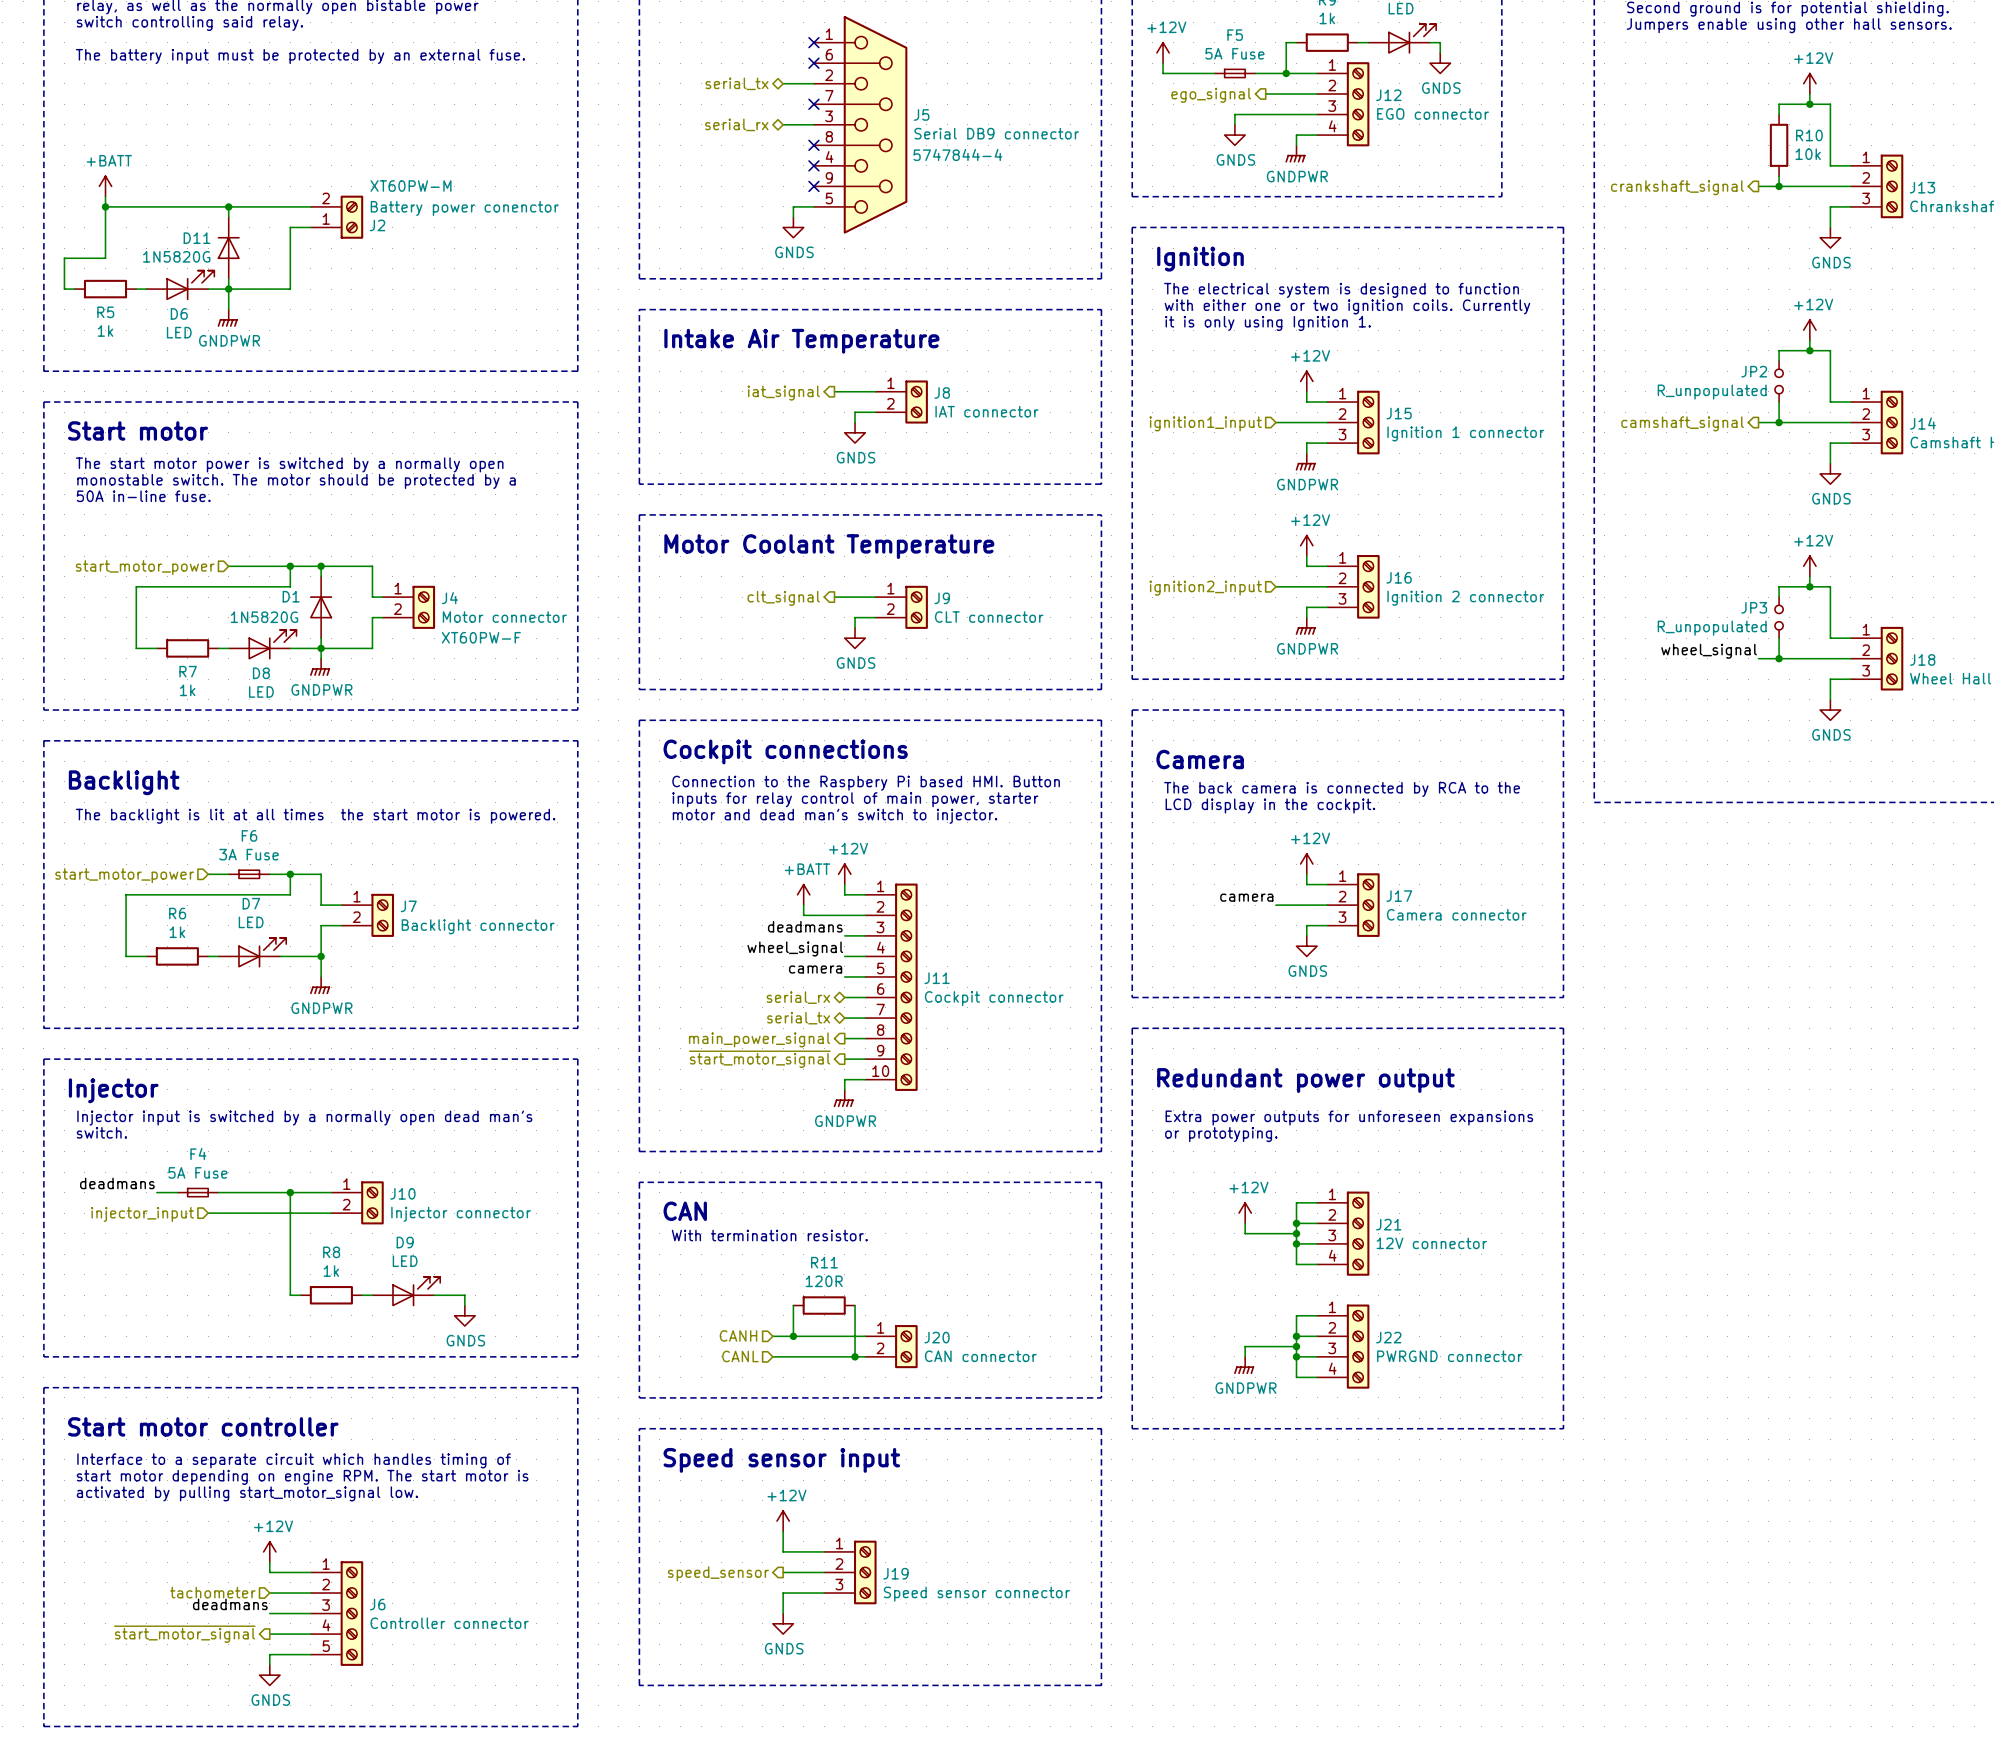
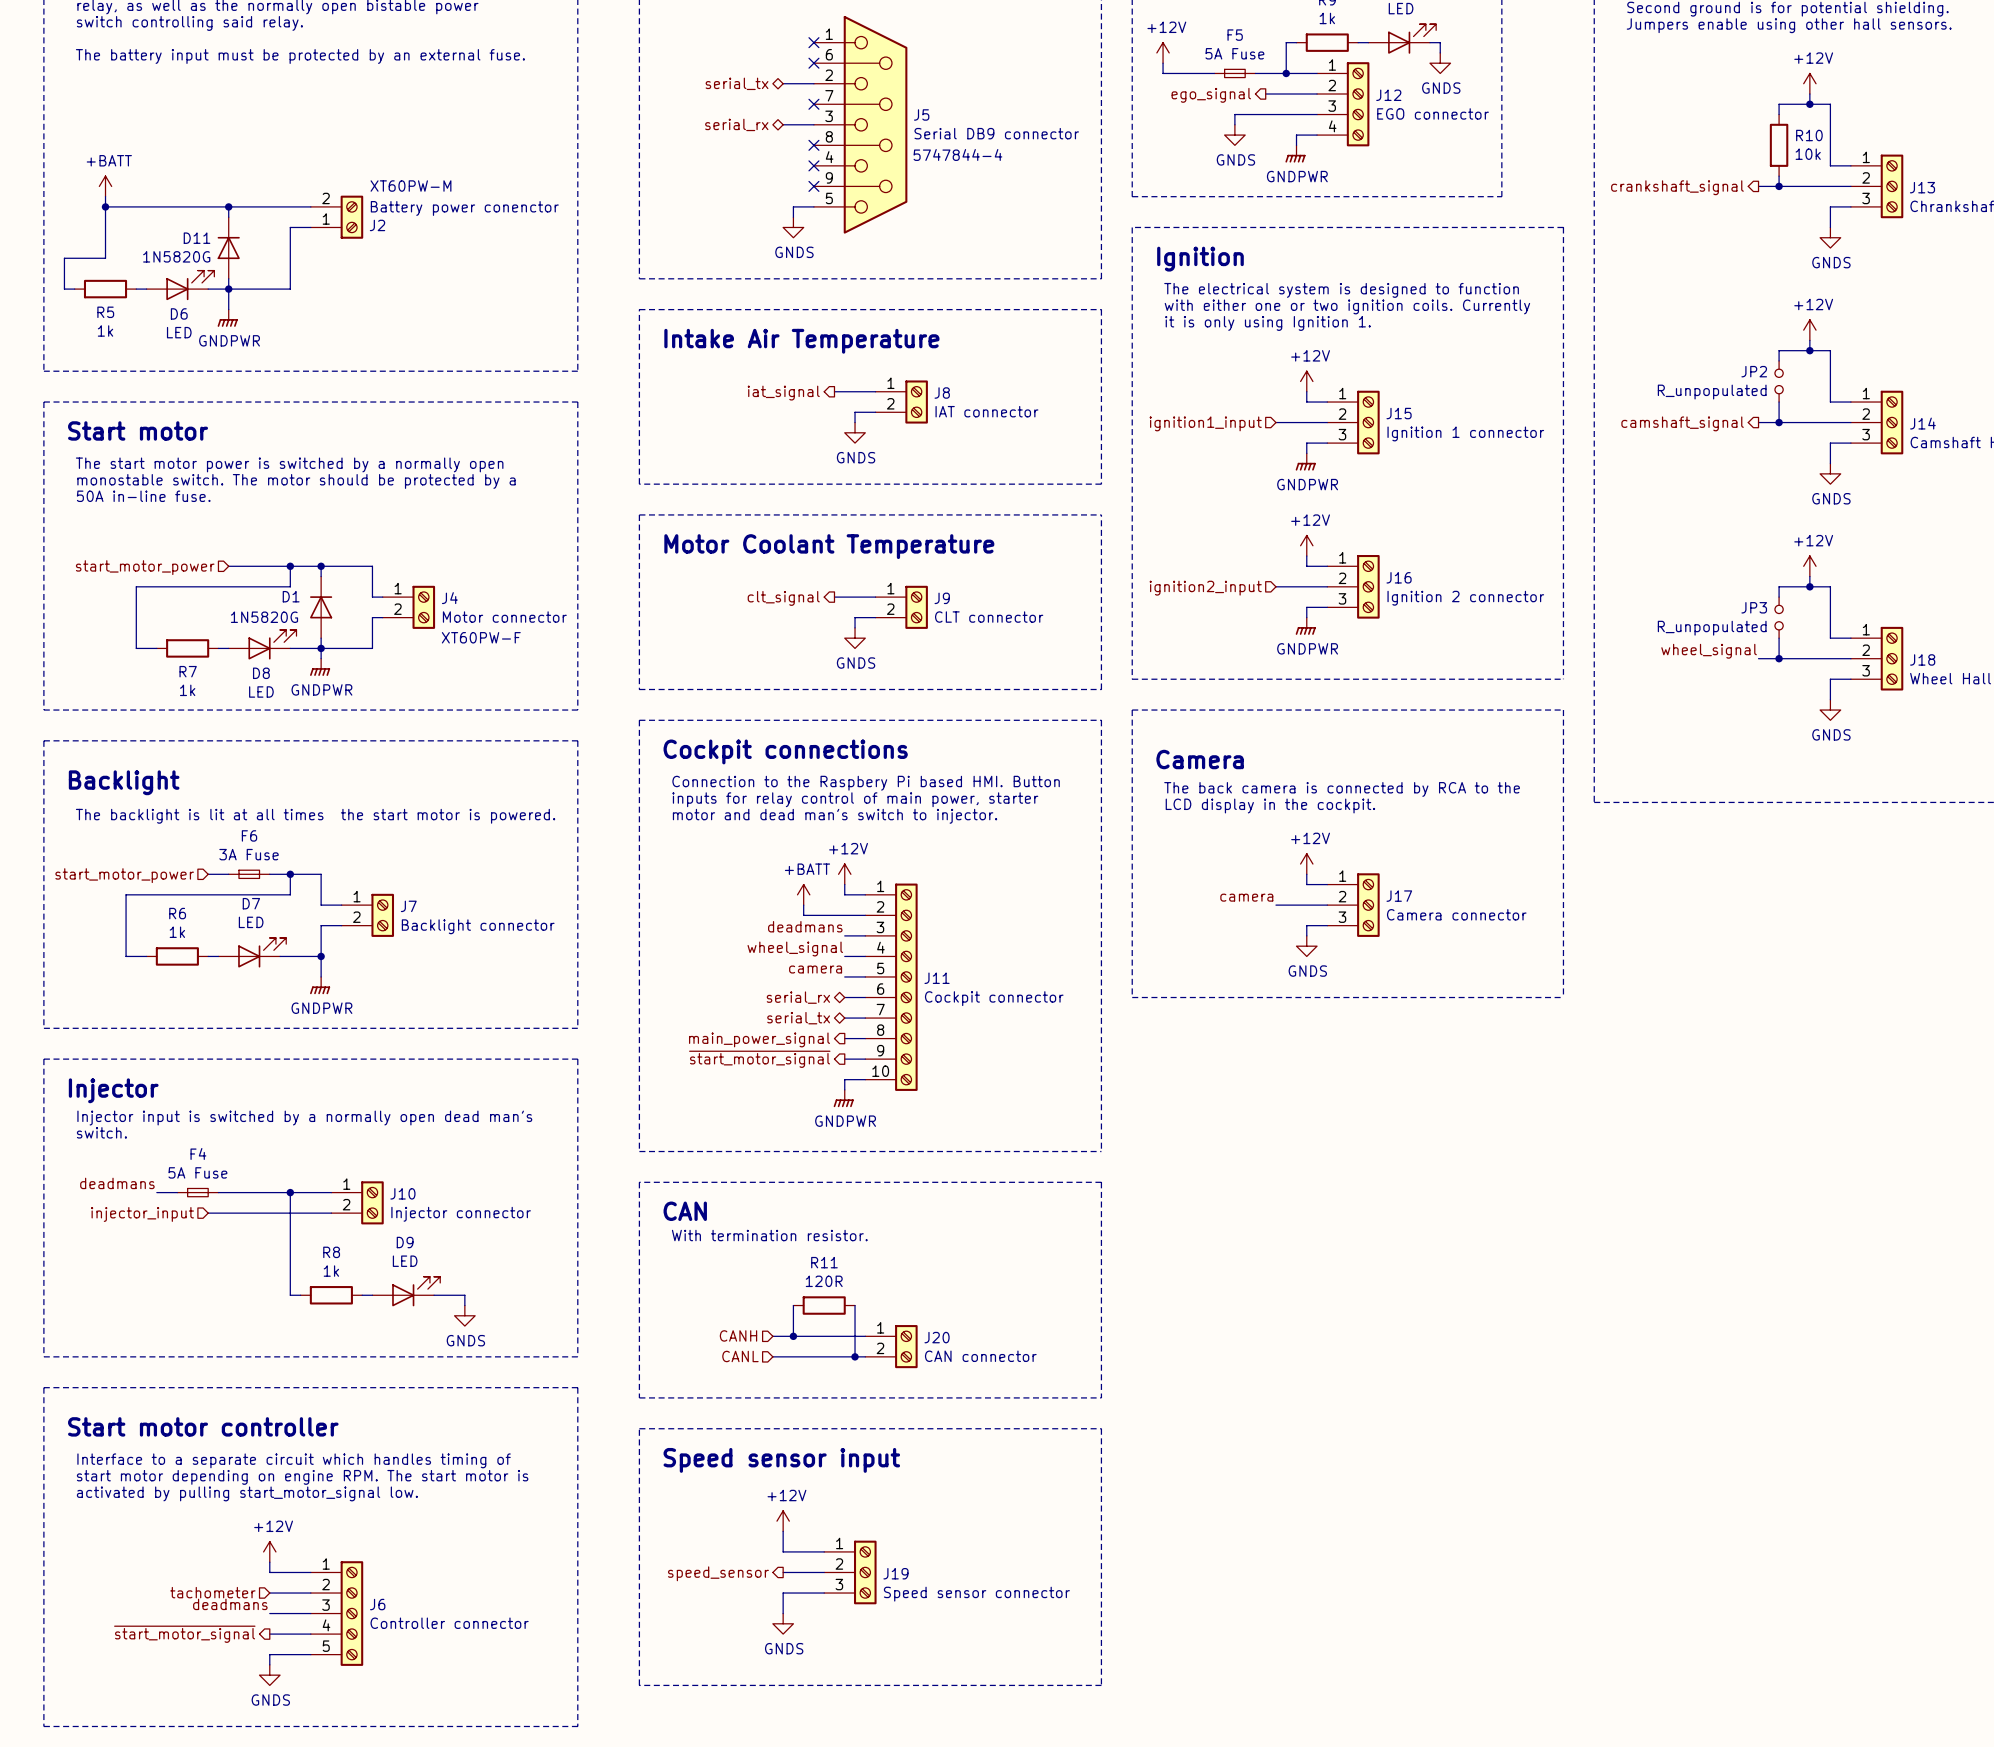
line: (1132, 1028) (1563, 1028) (1563, 1428) (1132, 1428) (1132, 1028) -> none
text: Redundant power output (1305, 1080) -> none
text: Extra power outputs for unforeseen expansions (1349, 1118) -> none
text: or prototyping. (1221, 1134) -> none
wire: (1317, 1202) (1296, 1202) (1296, 1264) (1317, 1264) -> none
power symbol: +12V (1245, 1213) -> none
wire: (1245, 1223) (1245, 1233) (1296, 1233) -> none
wire: (1296, 1223) (1317, 1223) -> none
junction: (1296, 1223) -> none
junction: (1296, 1233) -> none
J21: 12V connector (1343, 1233) -> none
wire: (1296, 1243) (1317, 1243) -> none
junction: (1296, 1243) -> none
wire: (1317, 1315) (1296, 1315) (1296, 1377) (1317, 1377) -> none
wire: (1296, 1336) (1317, 1336) -> none
junction: (1296, 1336) -> none
wire: (1296, 1346) (1245, 1346) (1245, 1356) -> none
junction: (1296, 1346) -> none
J22: PWRGND connector (1343, 1346) -> none
wire: (1296, 1356) (1317, 1356) -> none
junction: (1296, 1356) -> none
power symbol: GNDPWR (1244, 1365) -> none

